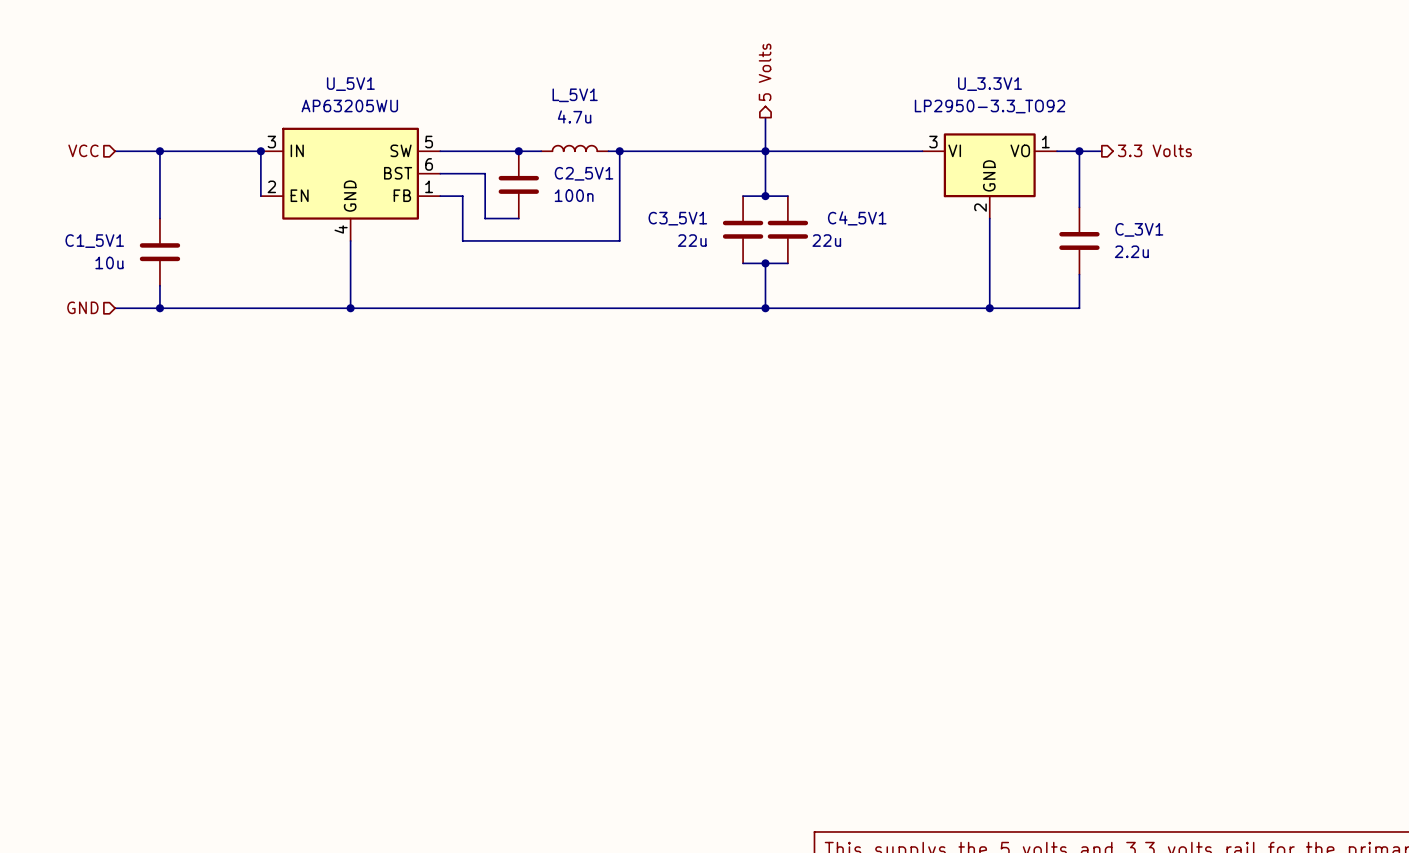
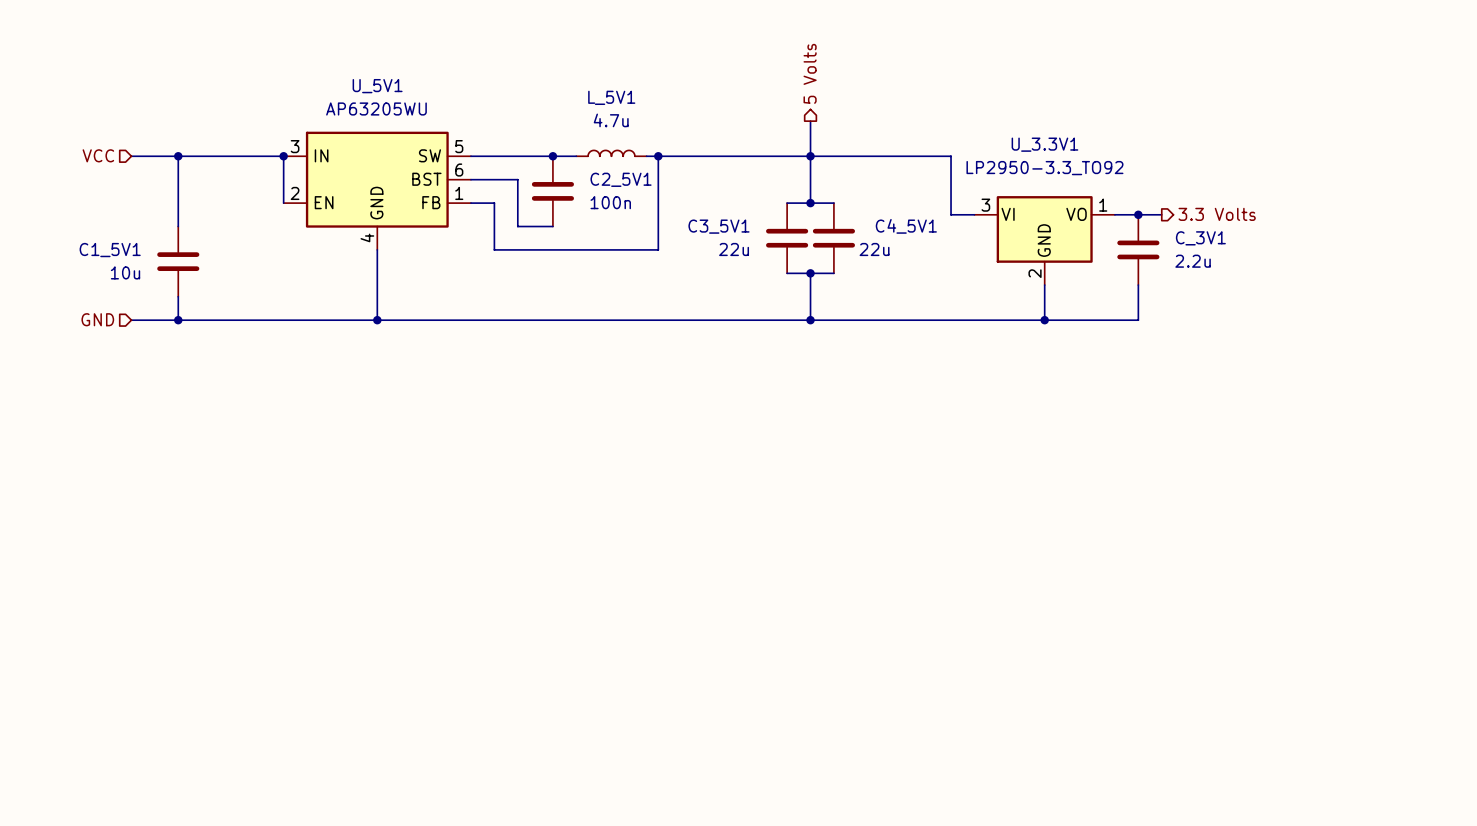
hierarchical label position: 3.3 Volts (1154, 150) -> 3.3 Volts (1217, 214)
wire: (900, 151) (922, 151) -> (951, 156) (951, 214) (974, 214)
wire: (1057, 151) (1101, 151) -> (1114, 214) (1161, 214)
wire: (1079, 151) (1079, 207) -> none
junction: (1079, 151) -> none
U_3.3V1 position: (989, 175) -> (1044, 240)
junction: none -> (1138, 214)

